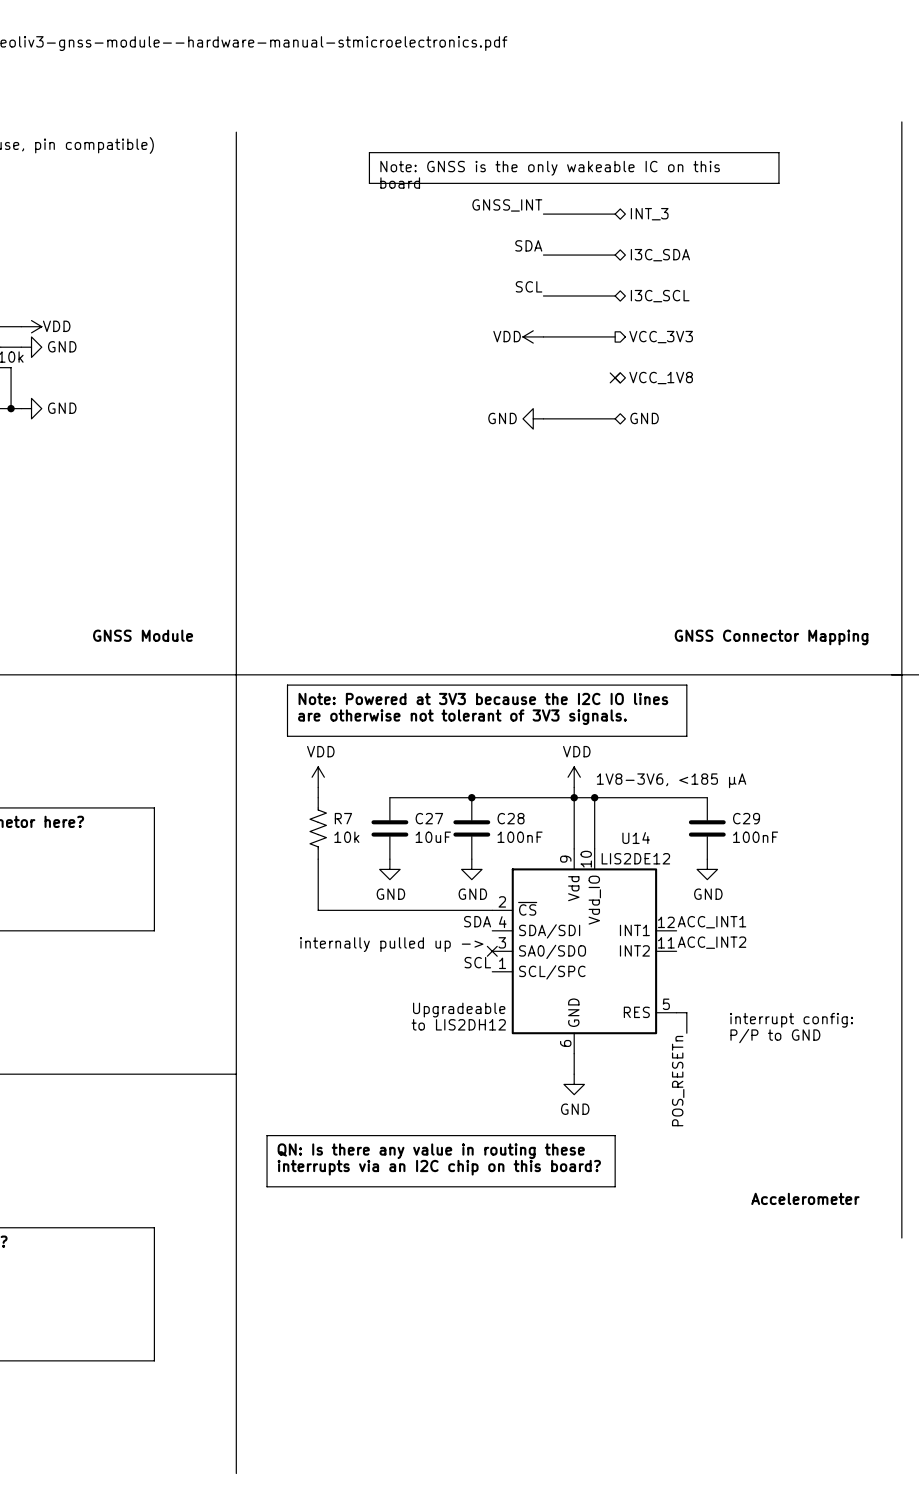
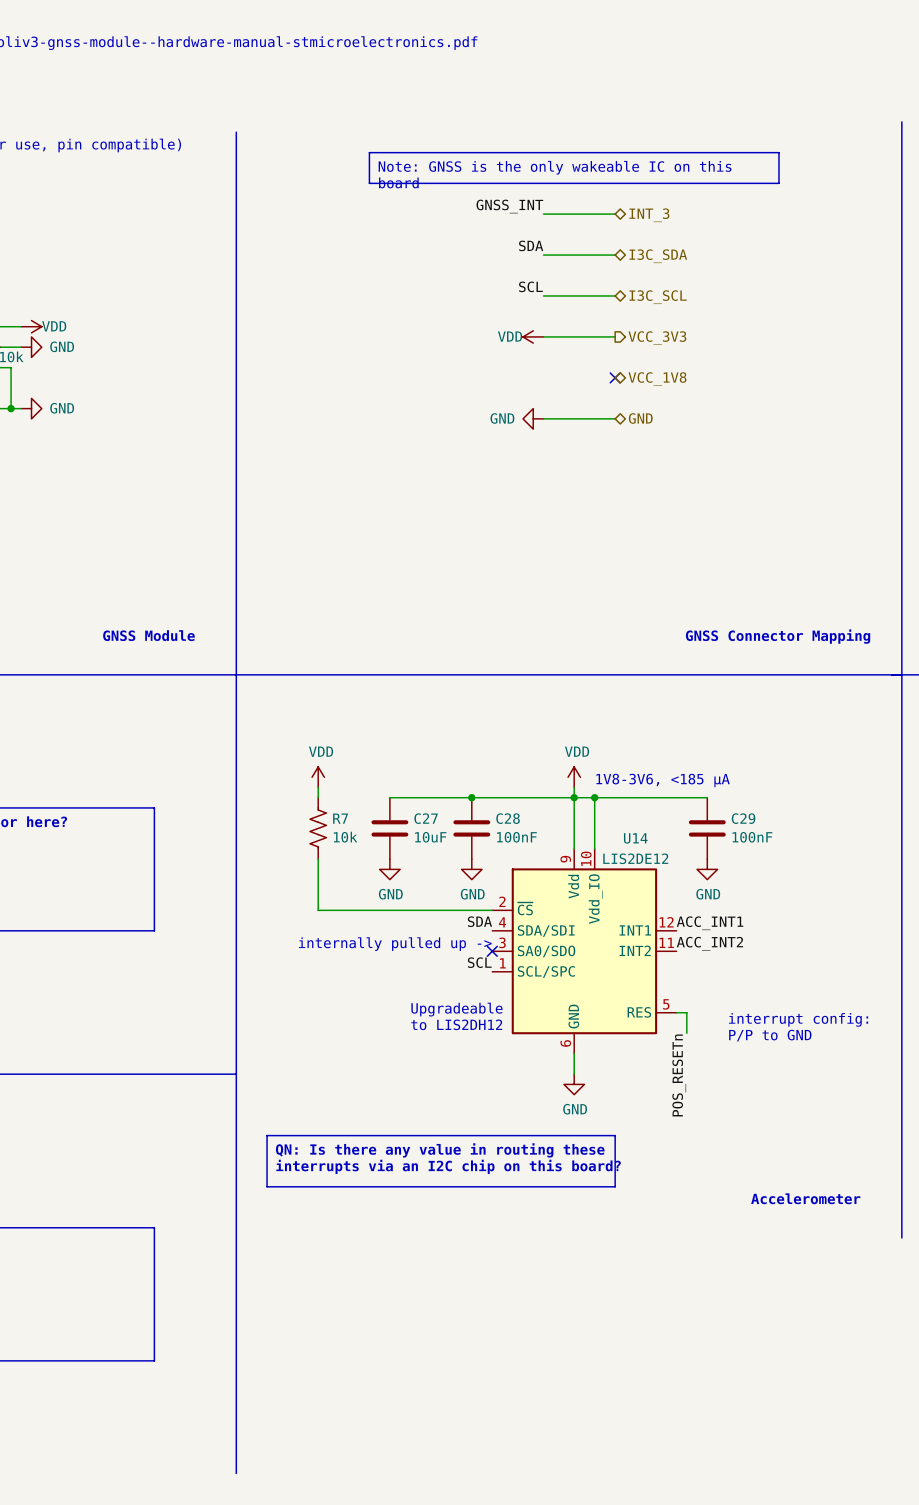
line: (287, 685) (686, 685) (686, 736) (287, 736) (287, 685) -> none
text: Note: Powered at 3V3 because the I2C IO lines (483, 698) -> none
text: are otherwise not tolerant of 3V3 signals. (462, 717) -> none

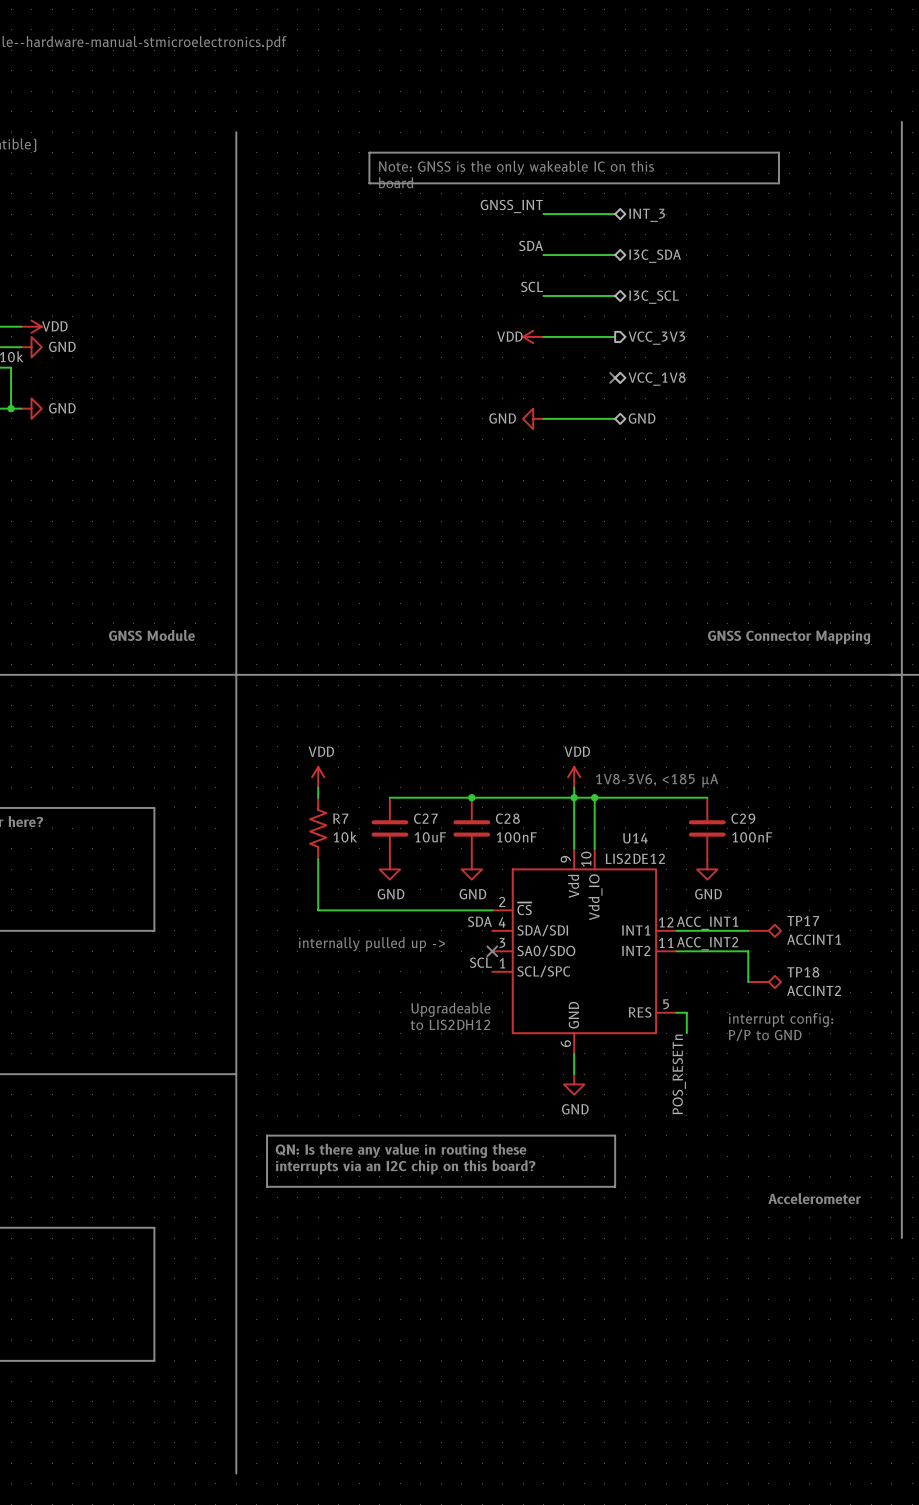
wire: none -> (676, 930) (748, 930)
TP17: none -> ACCINT1 (764, 930)
wire: none -> (676, 951) (748, 951) (748, 982)
TP18: none -> ACCINT2 (764, 982)

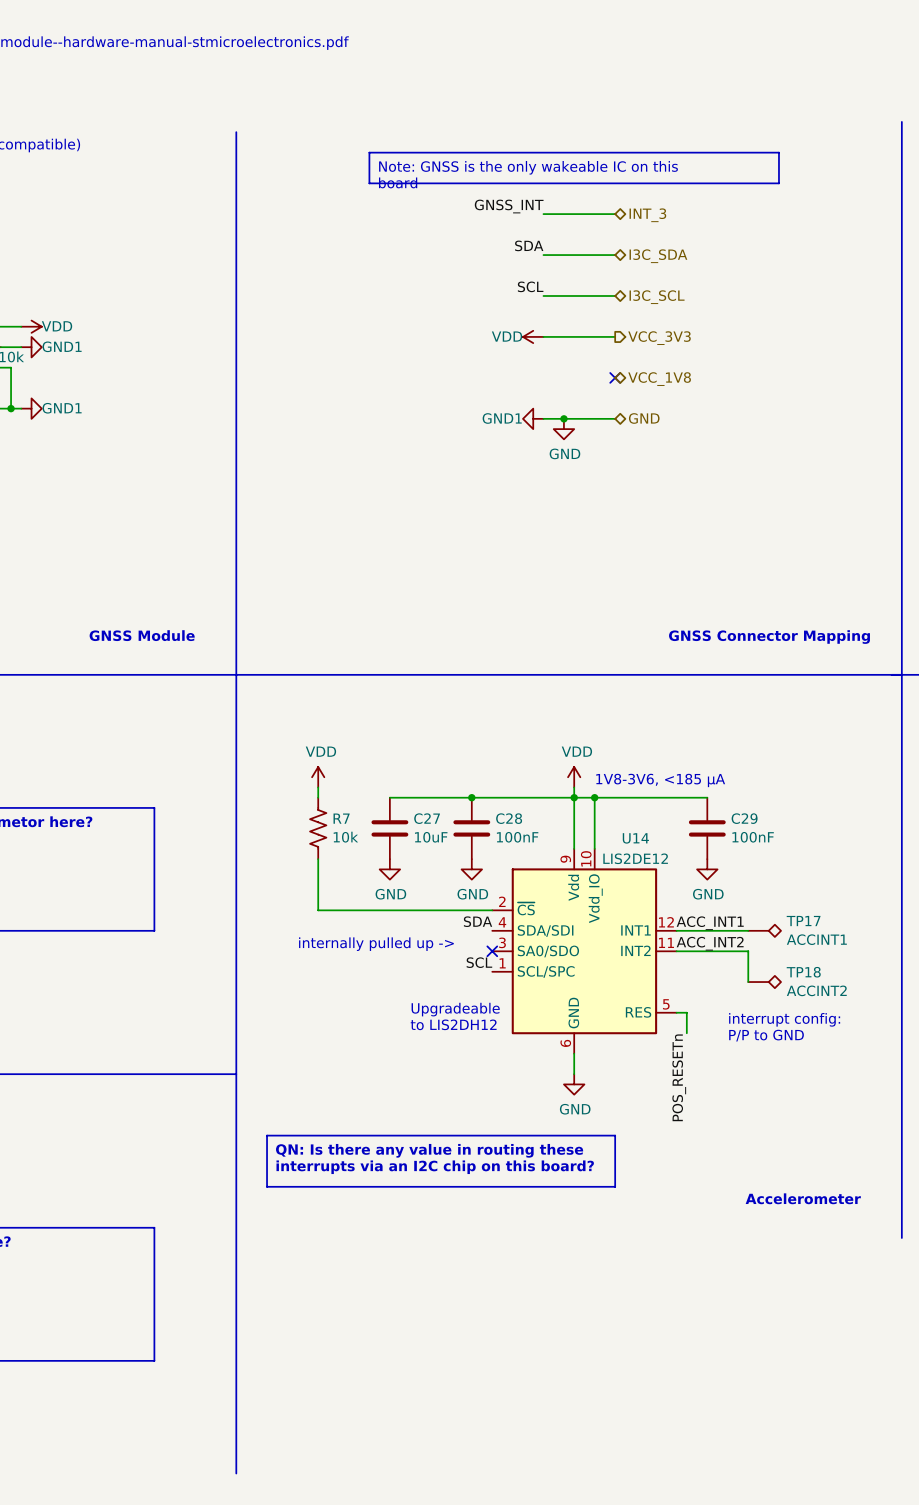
power symbol: GND (31, 347) -> GND1 (31, 347)
power symbol: GND (31, 408) -> GND1 (31, 408)
power symbol: GND (533, 418) -> GND1 (533, 418)
junction: none -> (563, 418)
power symbol: none -> GND (563, 429)

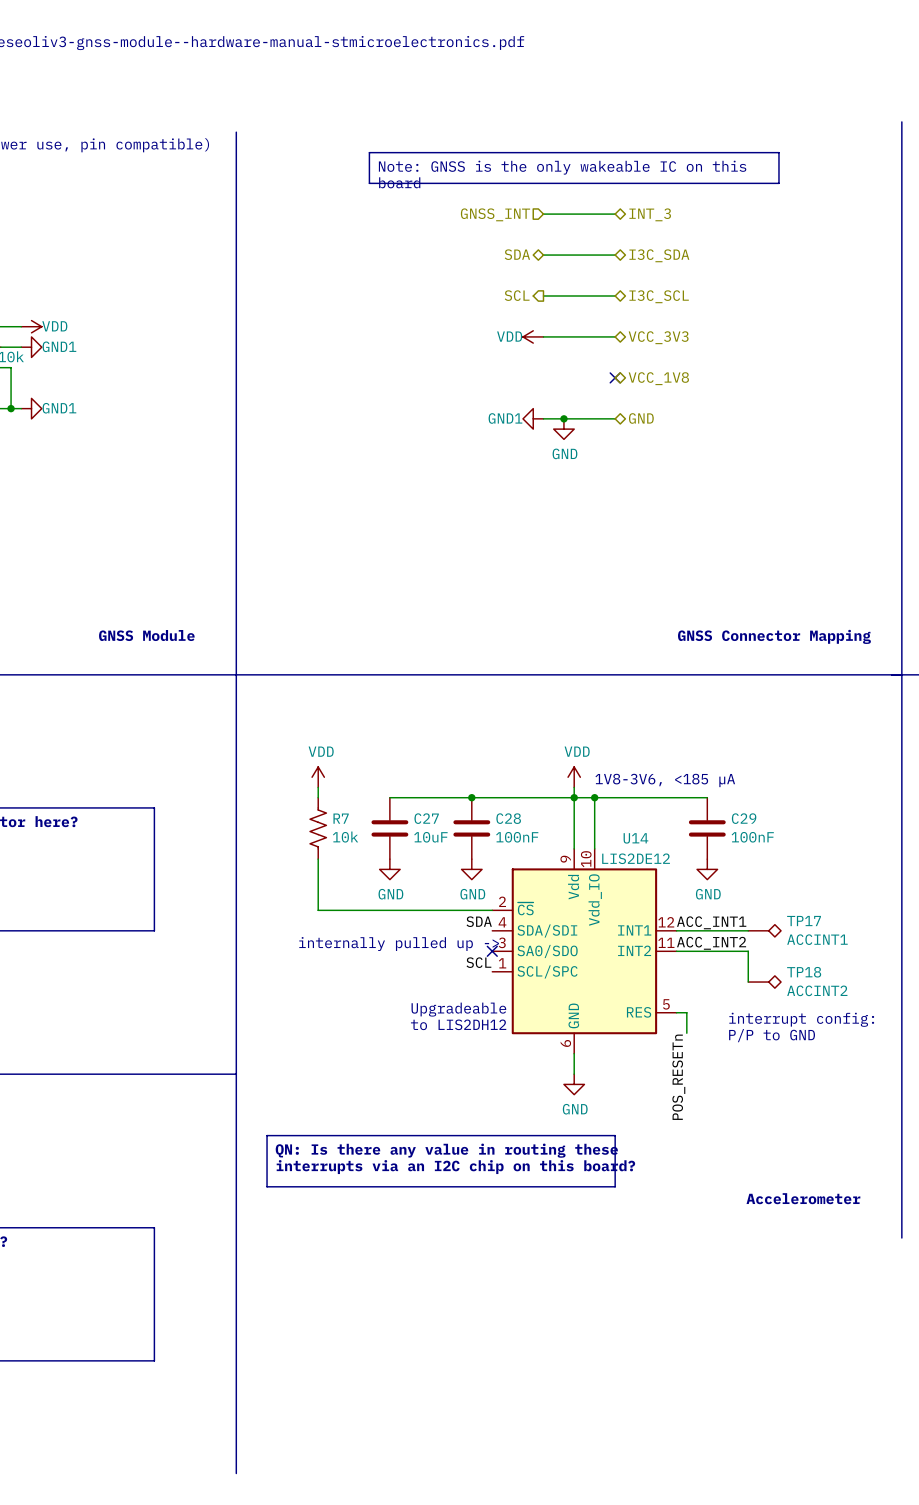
label: GNSS_INT (509, 206) -> none
hierarchical label: none -> GNSS_INT (495, 214)
label: SDA (529, 245) -> none
hierarchical label: none -> SDA (517, 254)
label: SCL (530, 286) -> none
hierarchical label: none -> SCL (517, 295)
hierarchical label shape: output (659, 338) -> bidirectional (658, 337)

